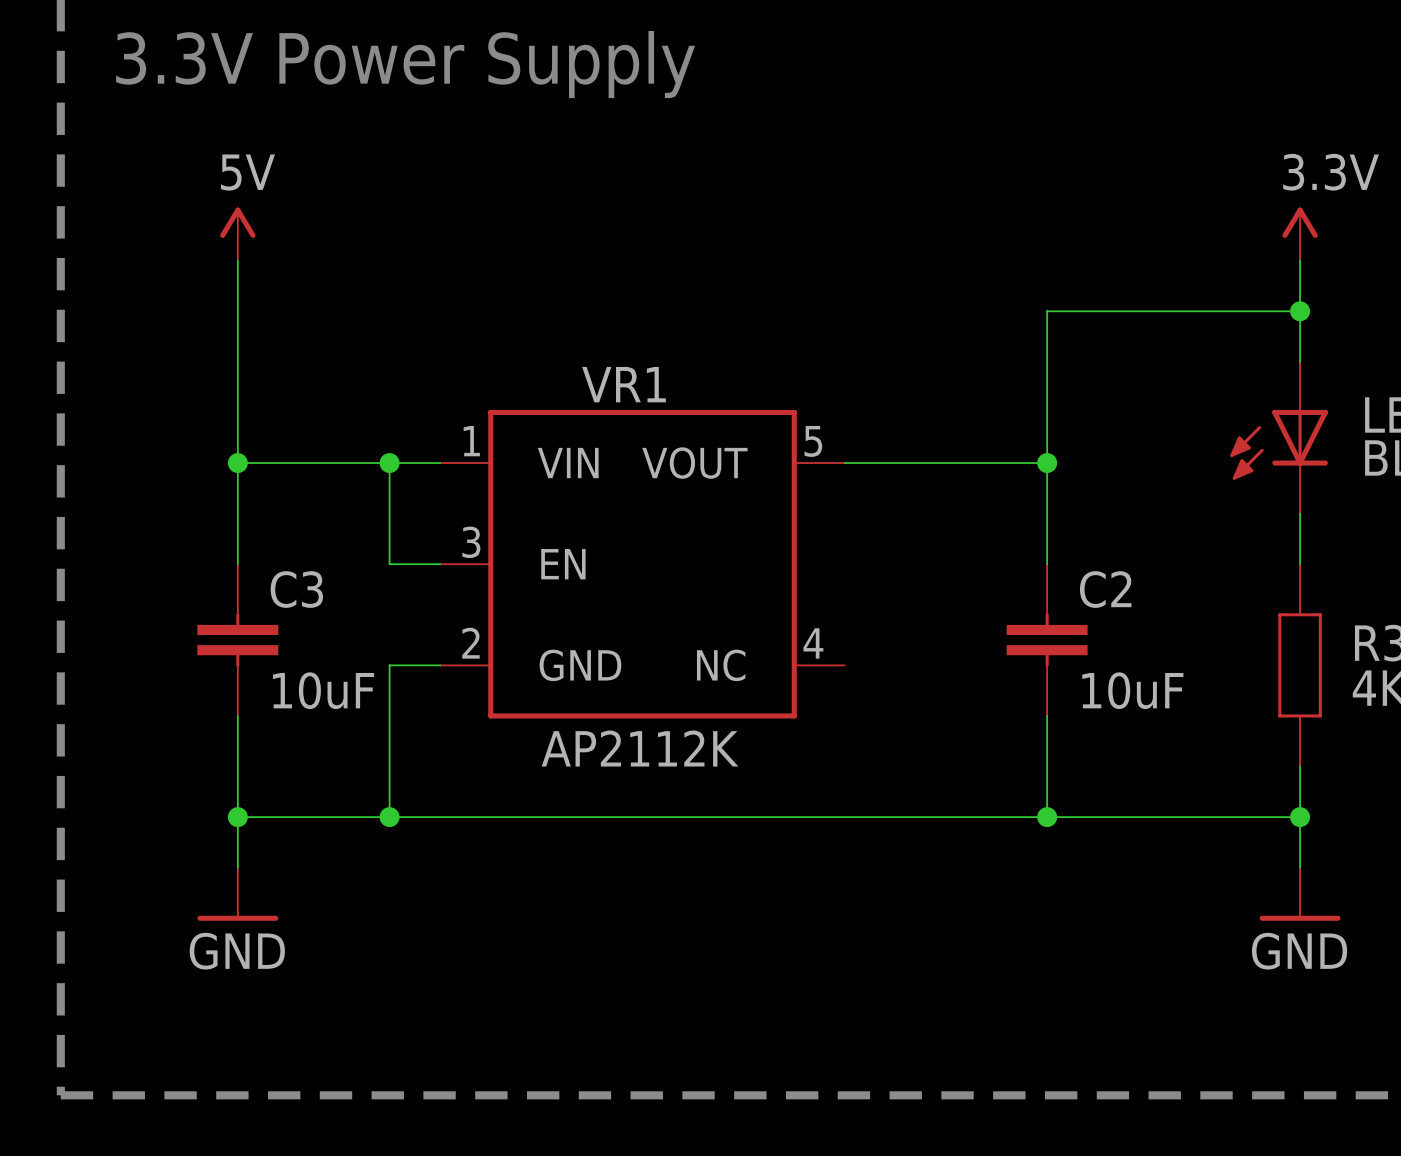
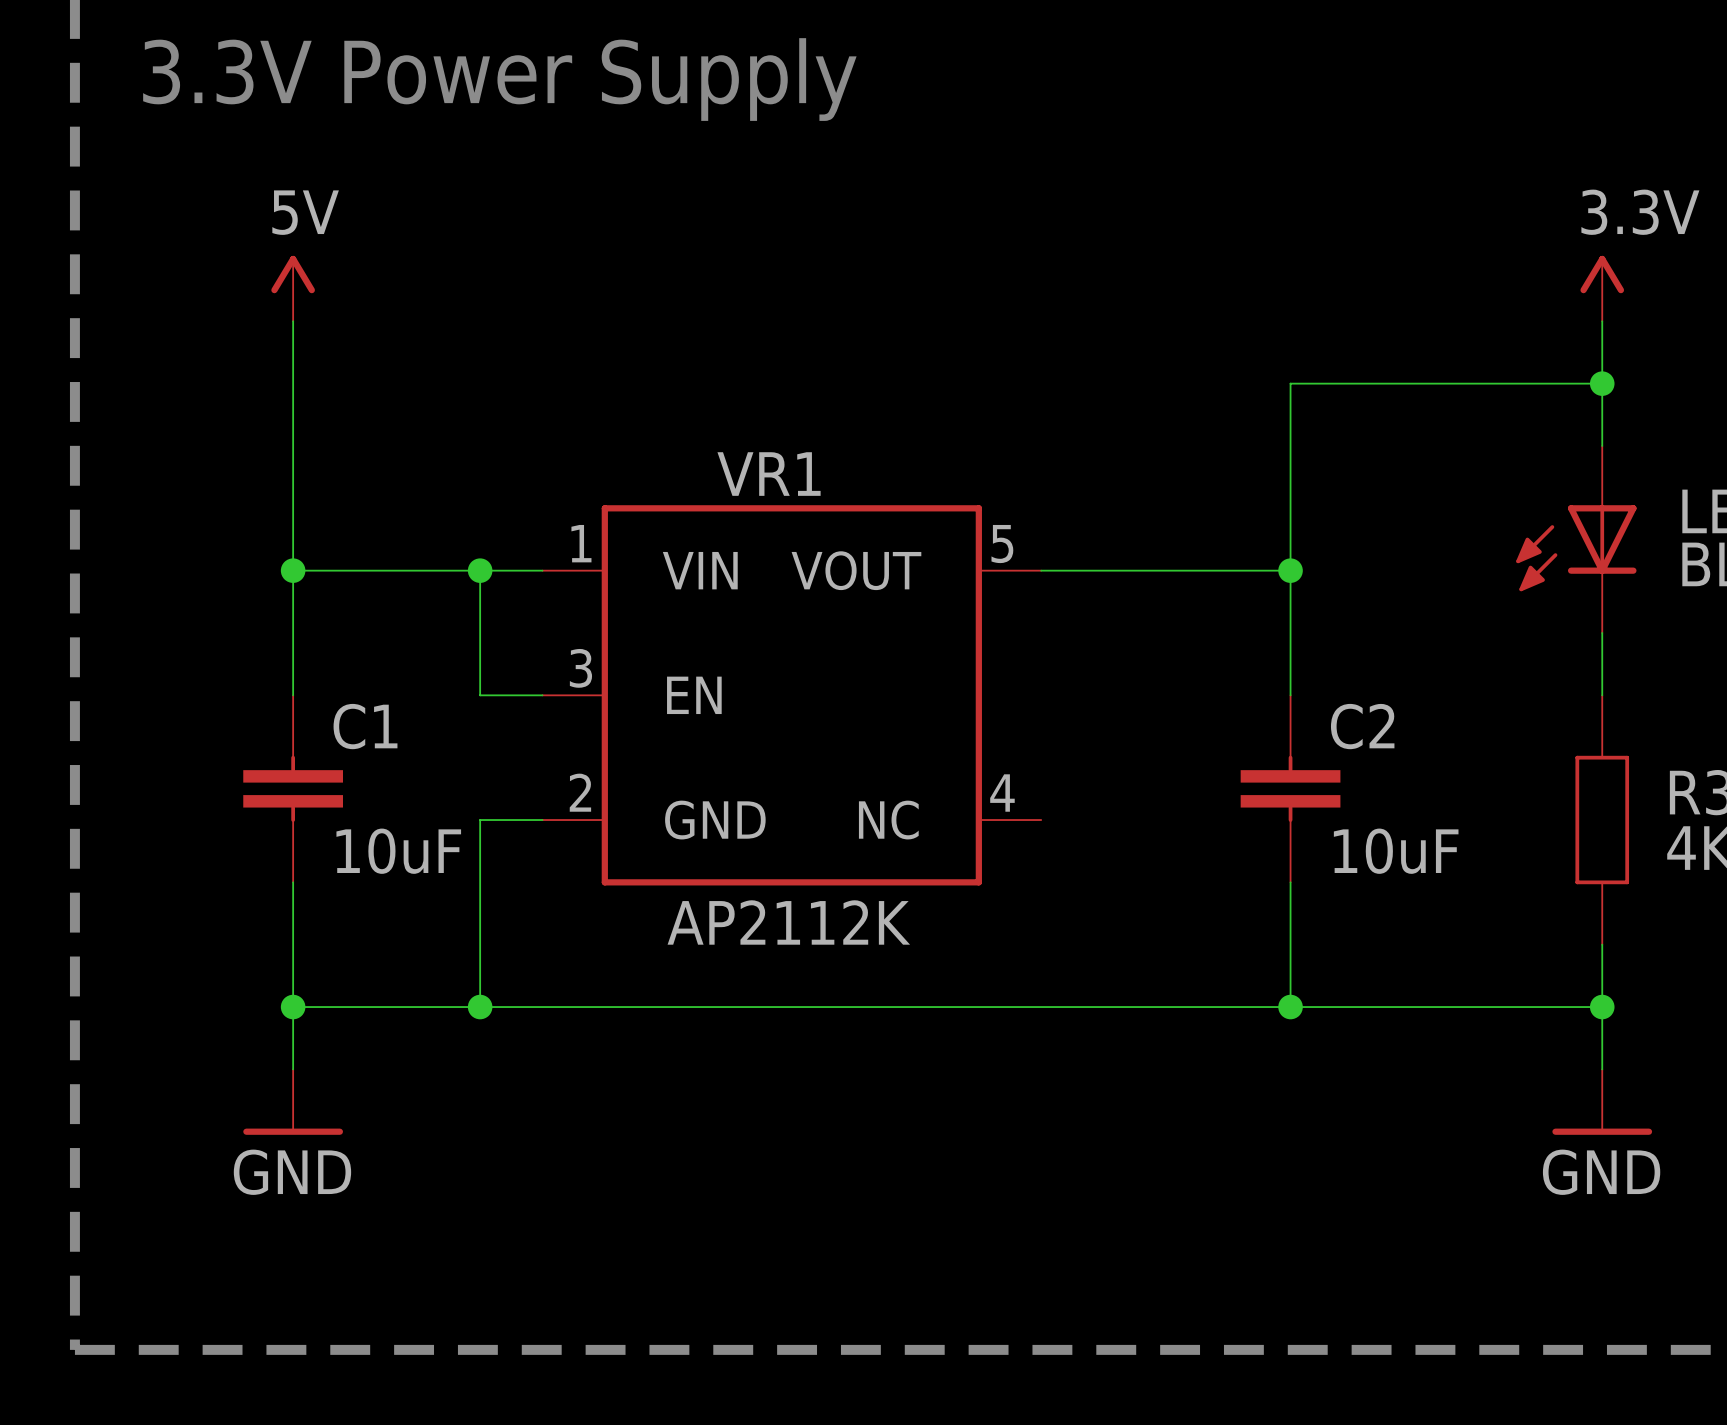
C3 name: C3 (296, 589) -> C1 (365, 726)

